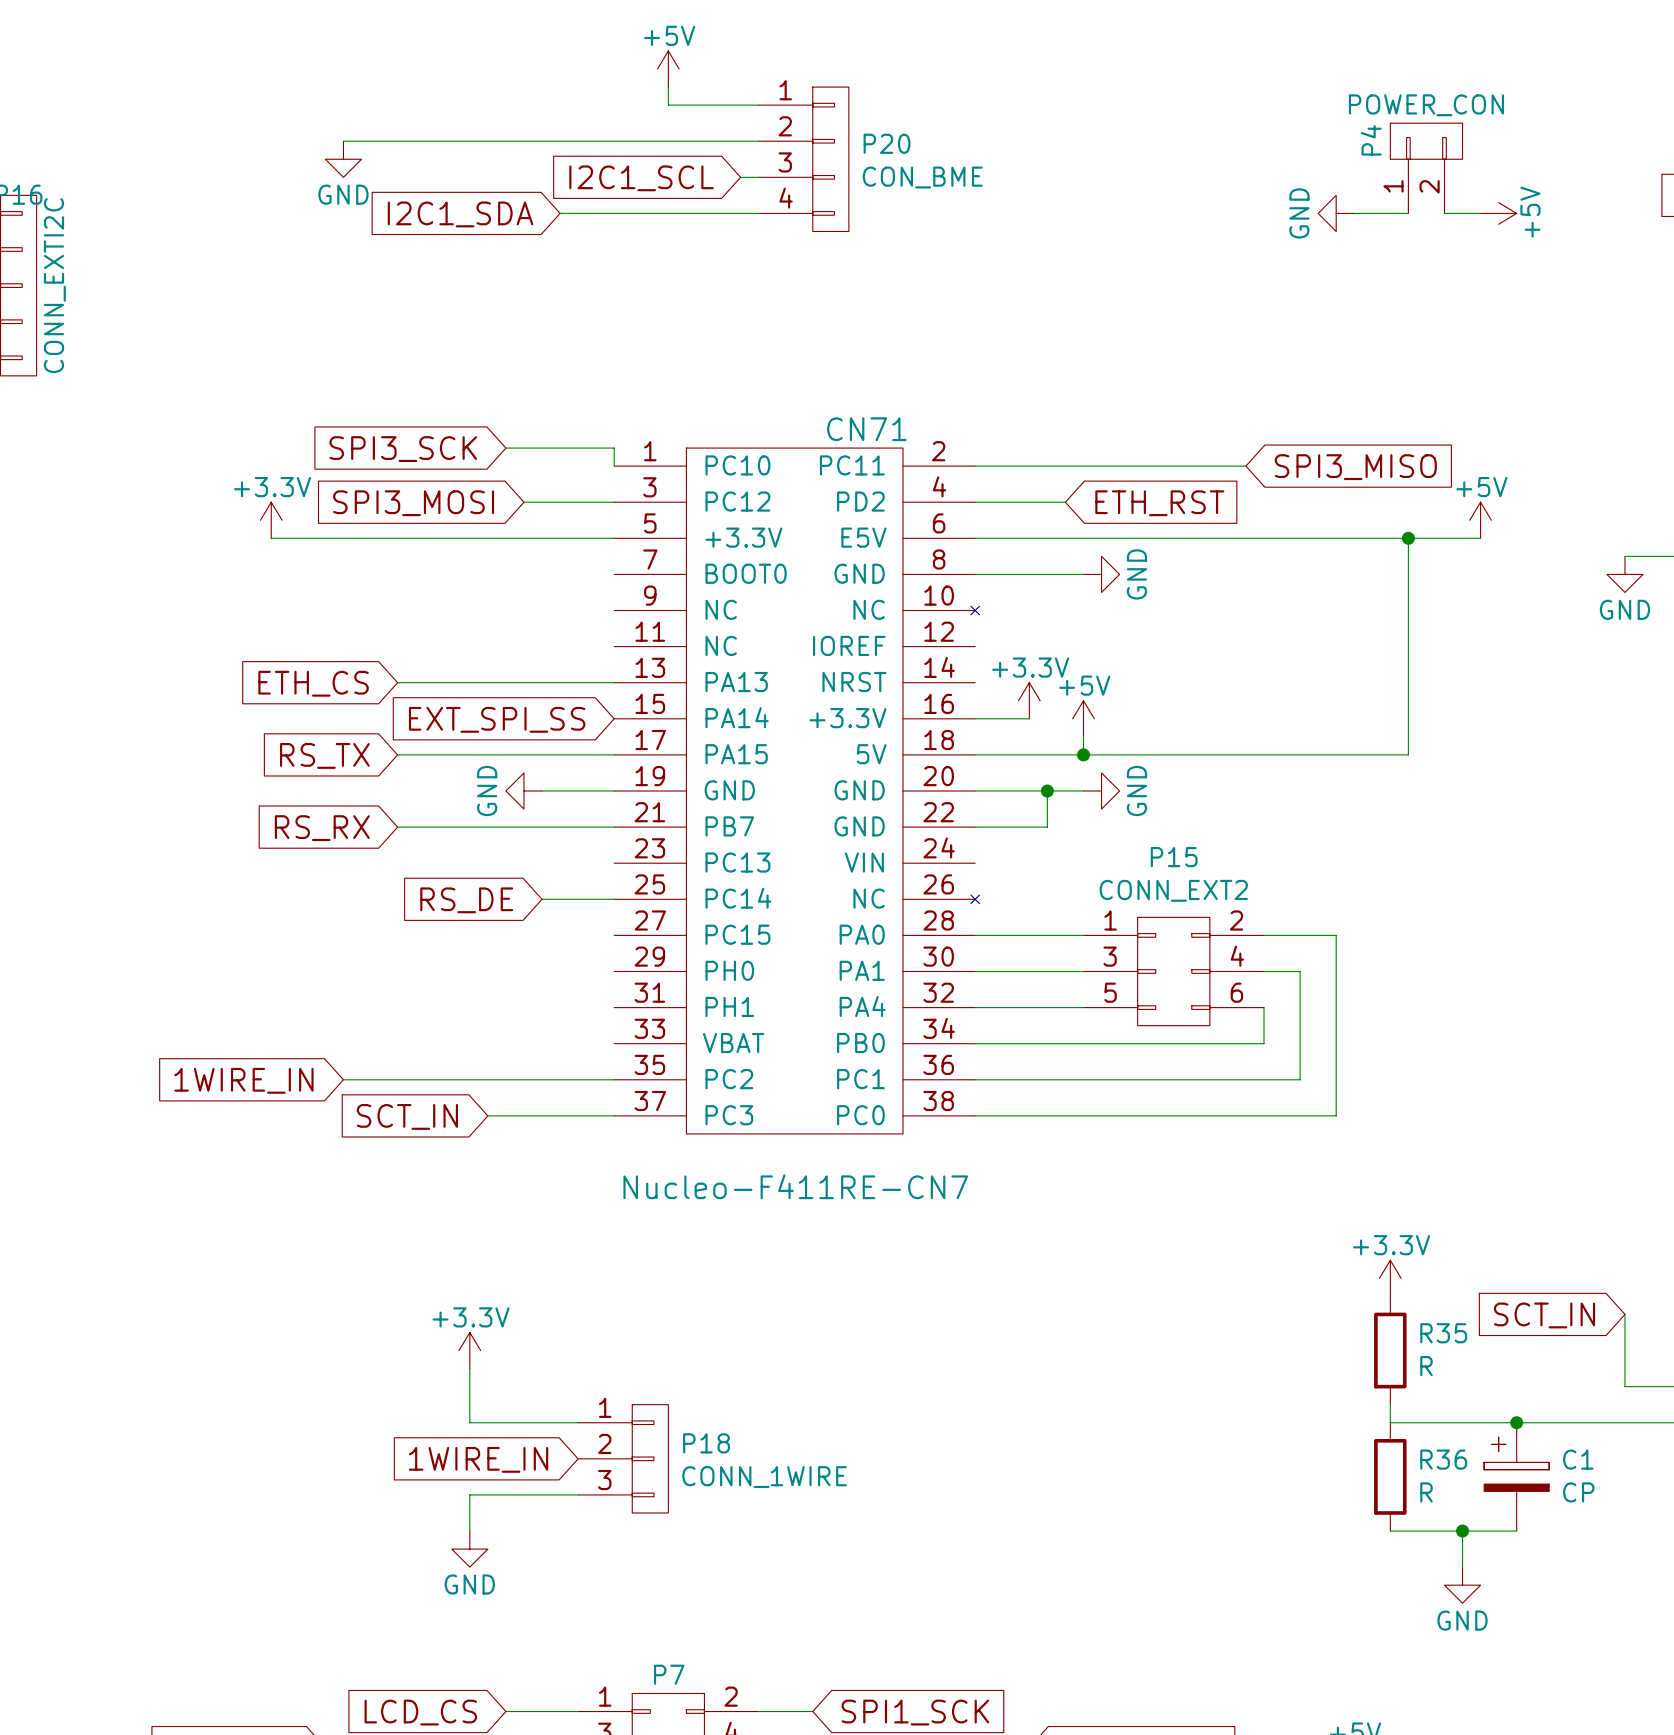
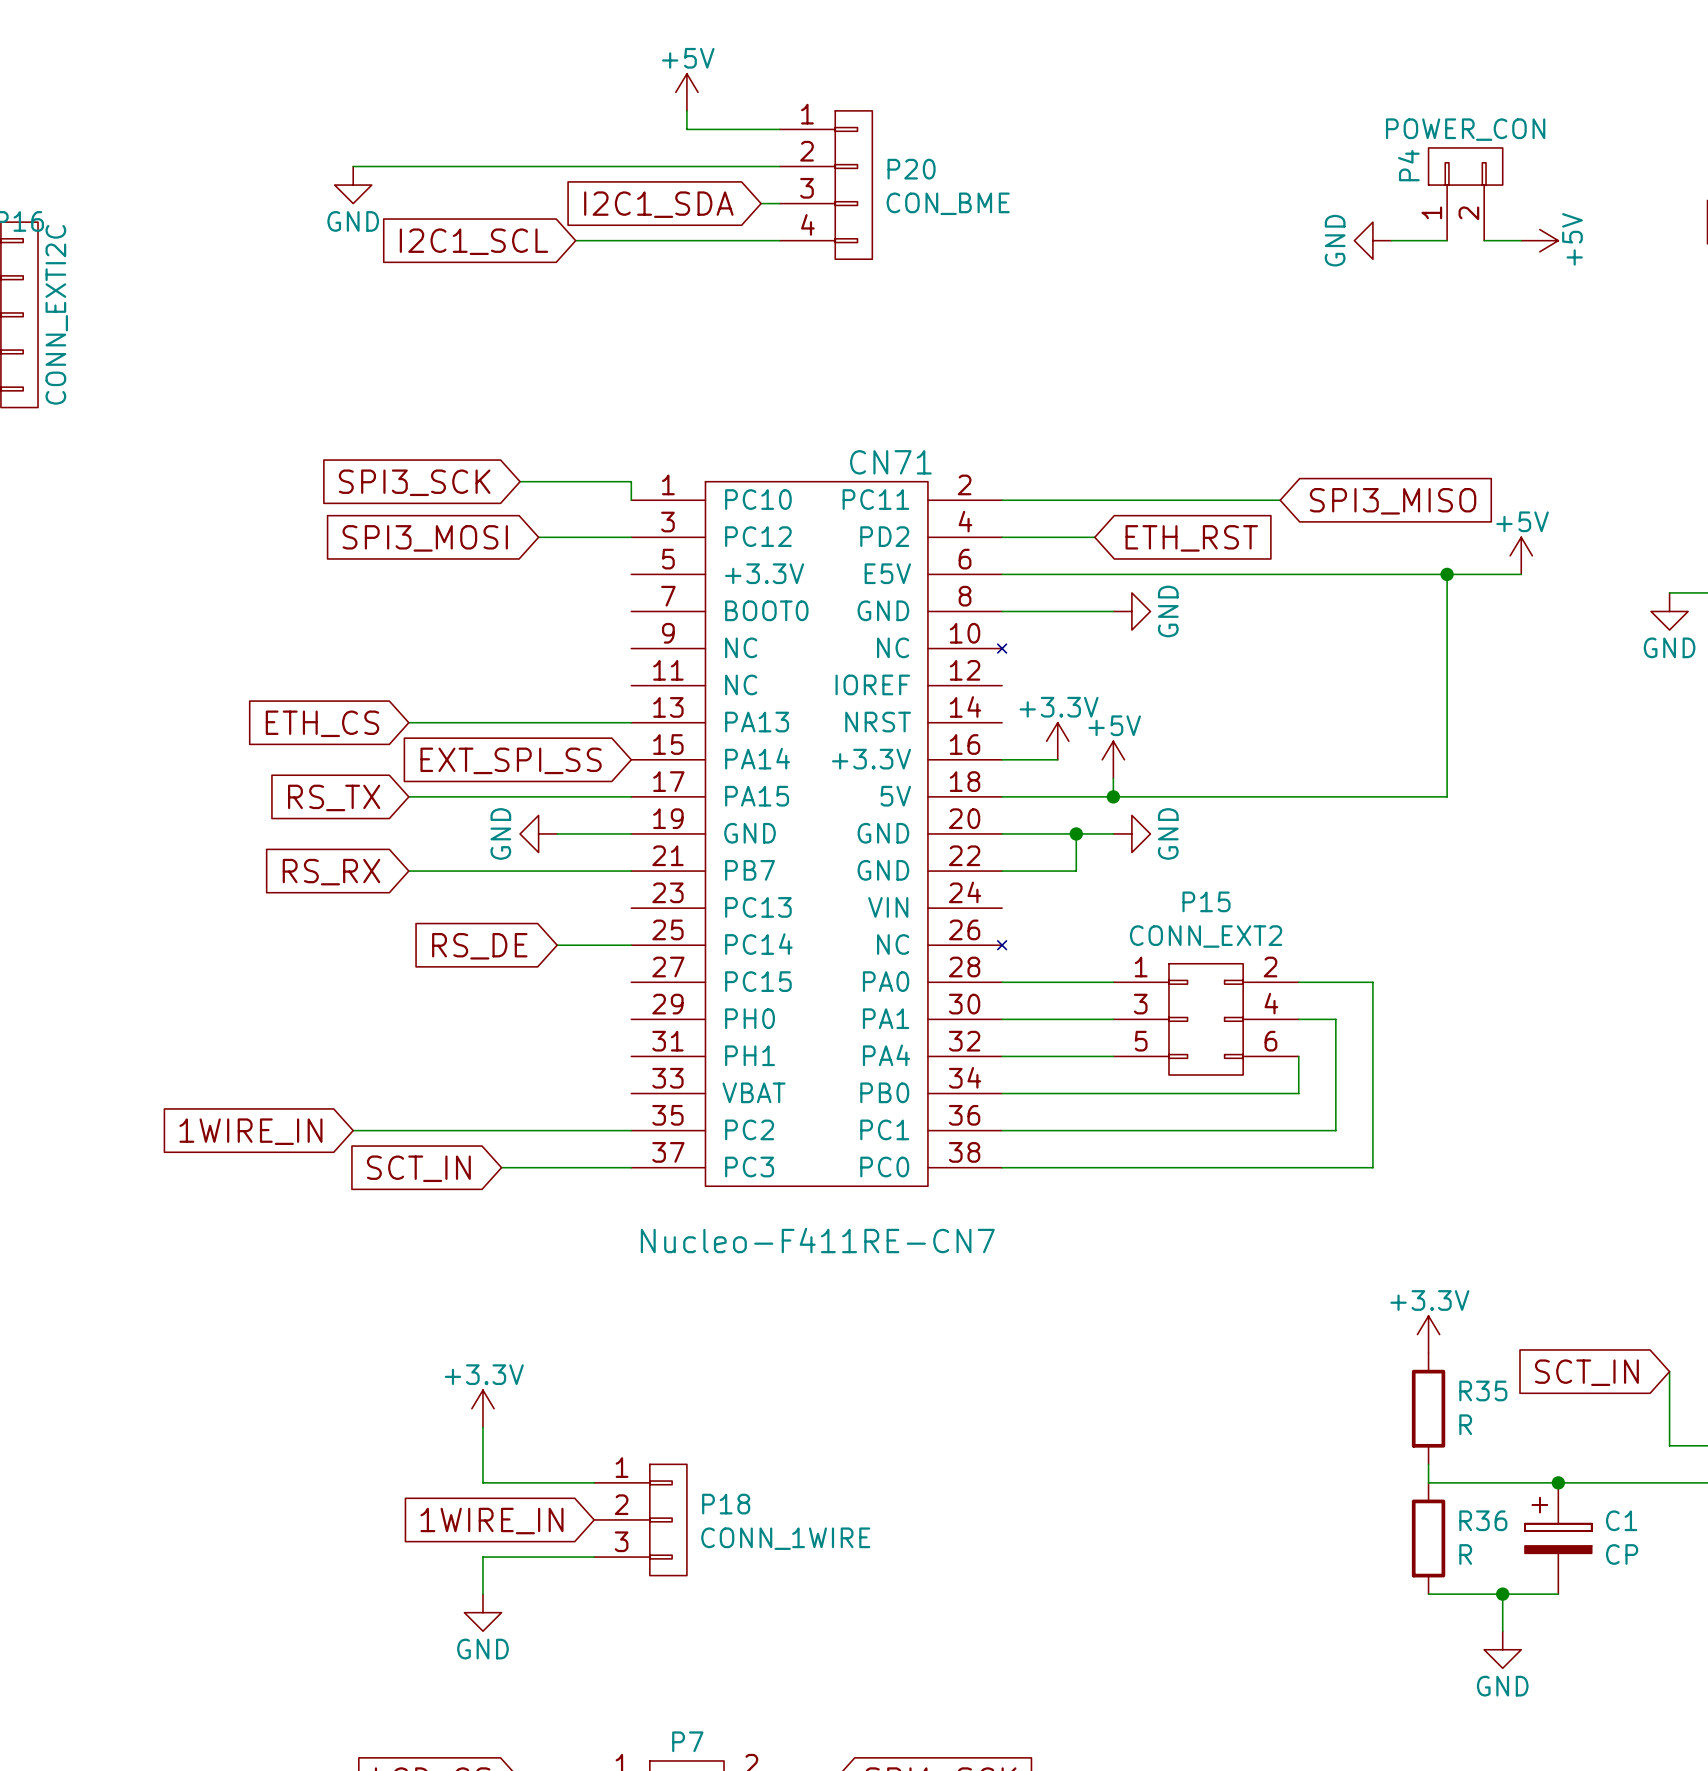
global label: I2C1_SCL (641, 178) -> I2C1_SDA (658, 204)
global label: I2C1_SDA (460, 214) -> I2C1_SCL (473, 241)
power symbol: +3.3V (271, 520) -> none
wire: (271, 538) (614, 538) -> none

